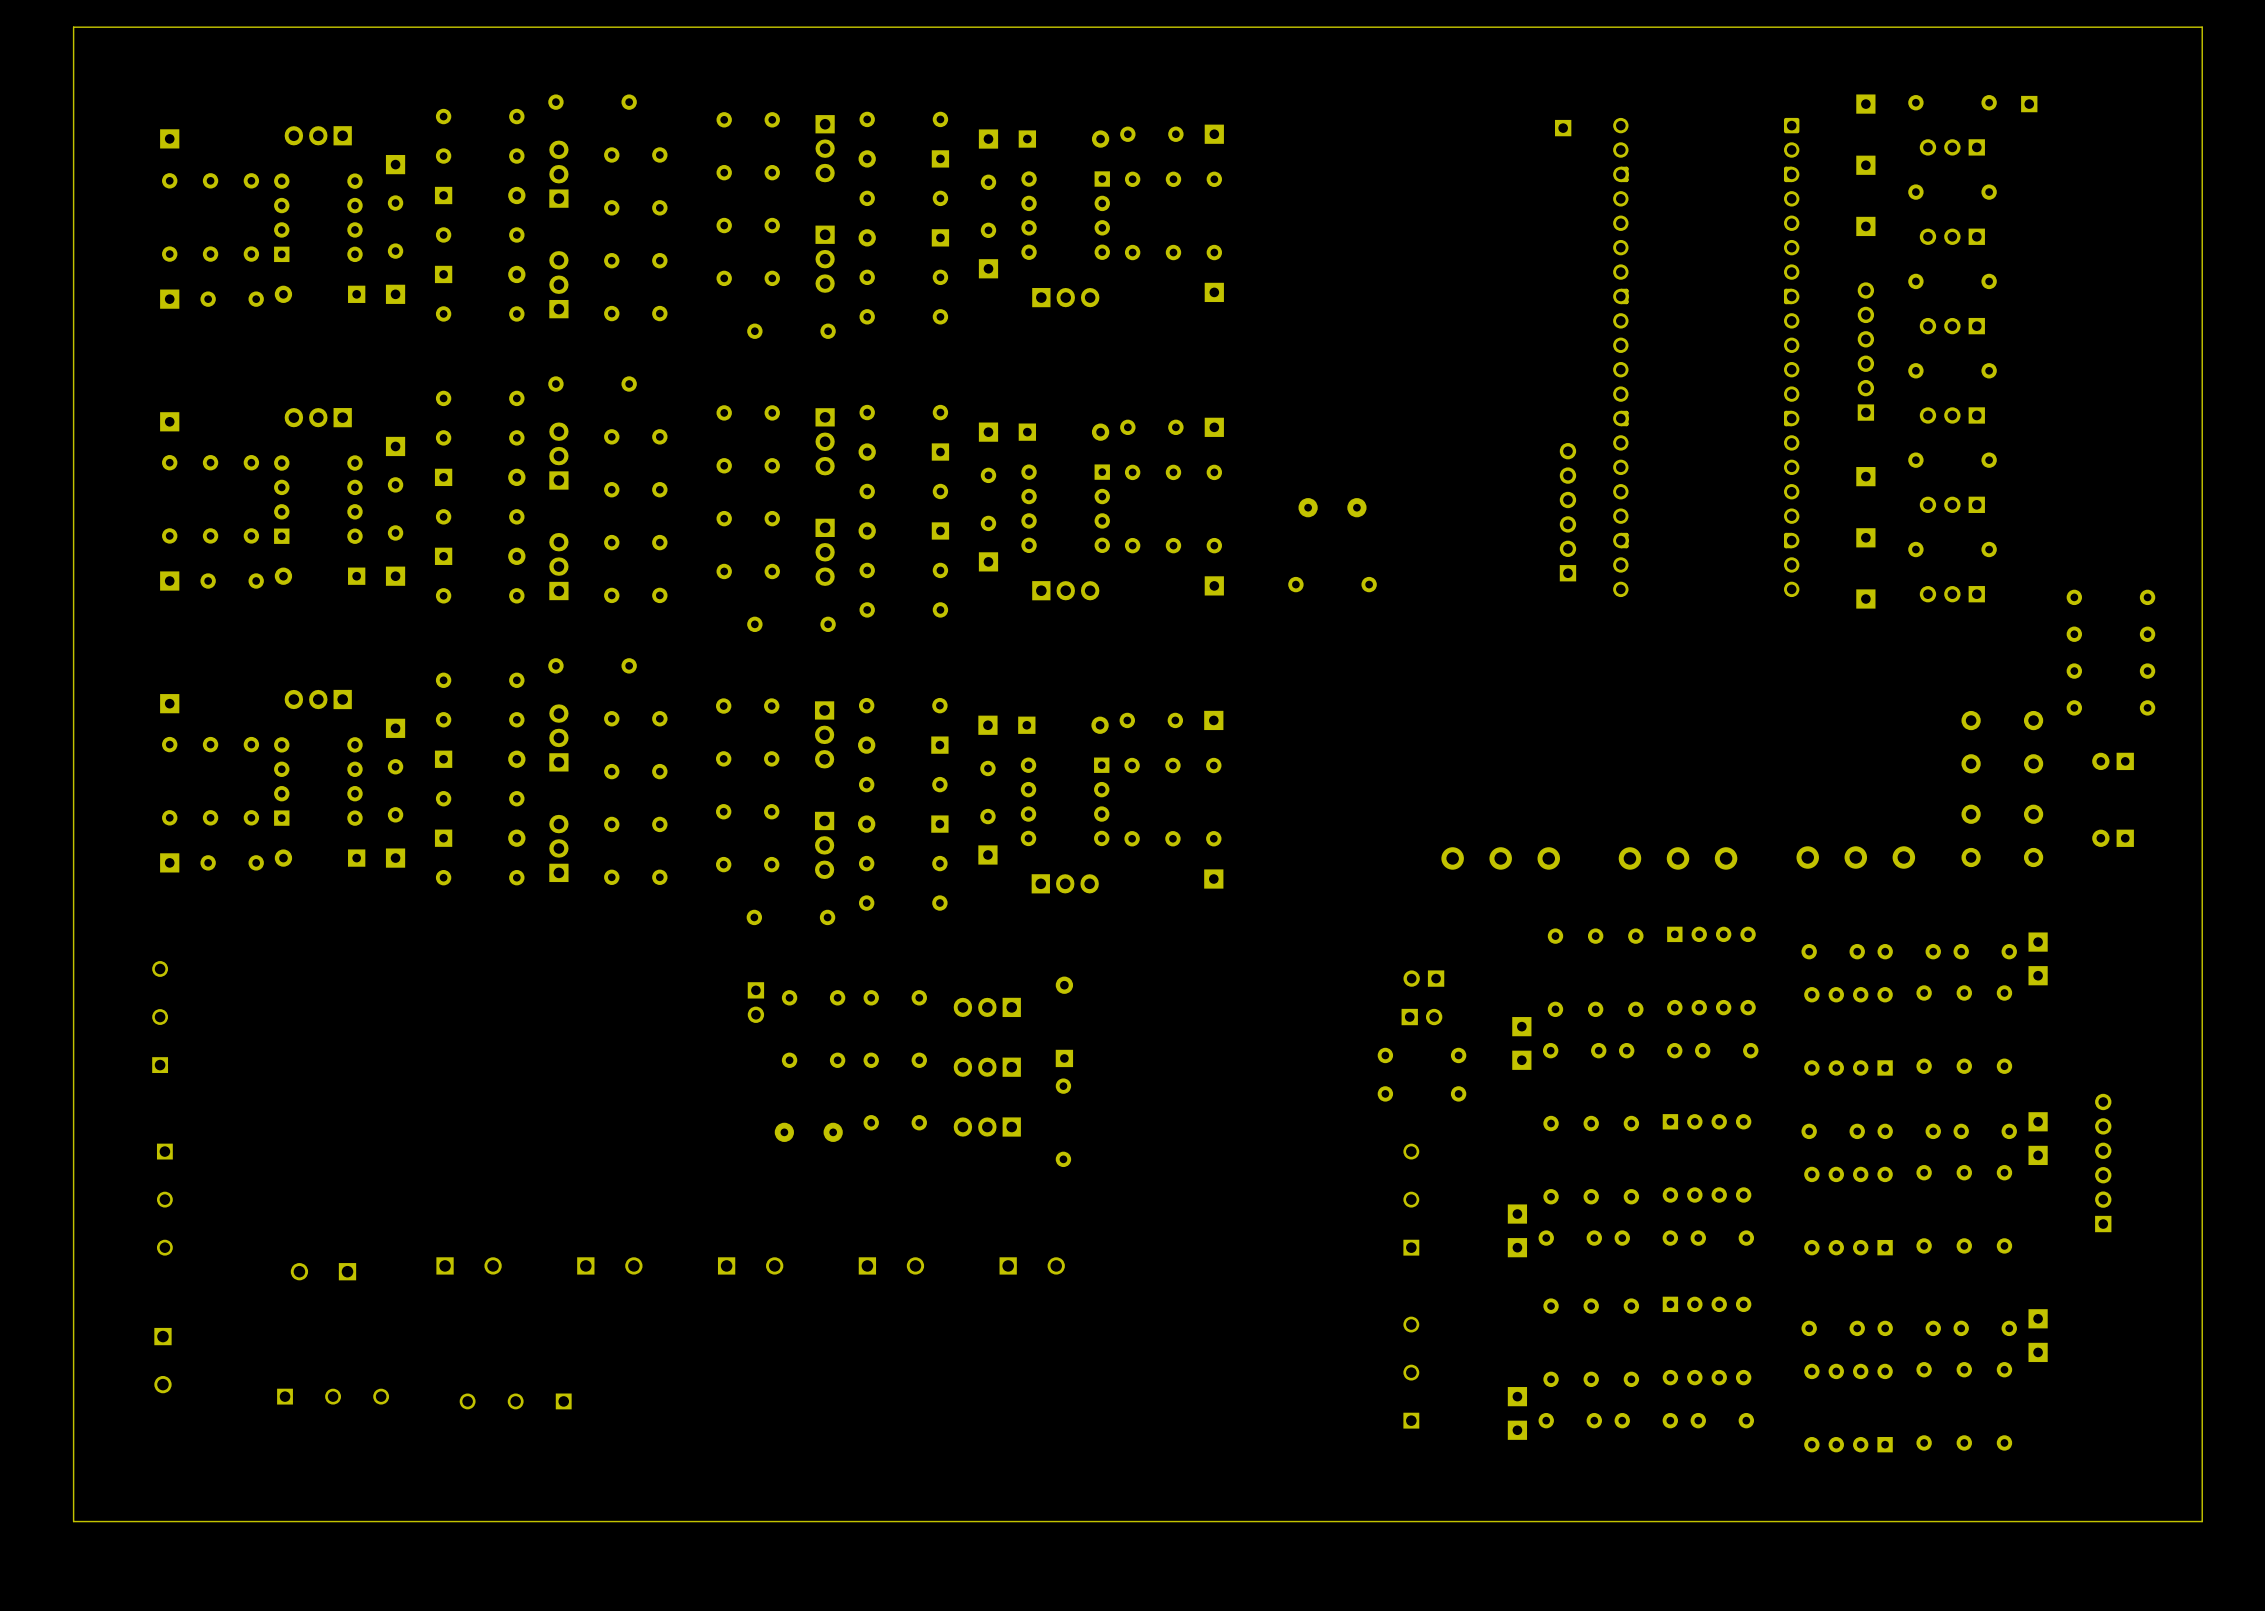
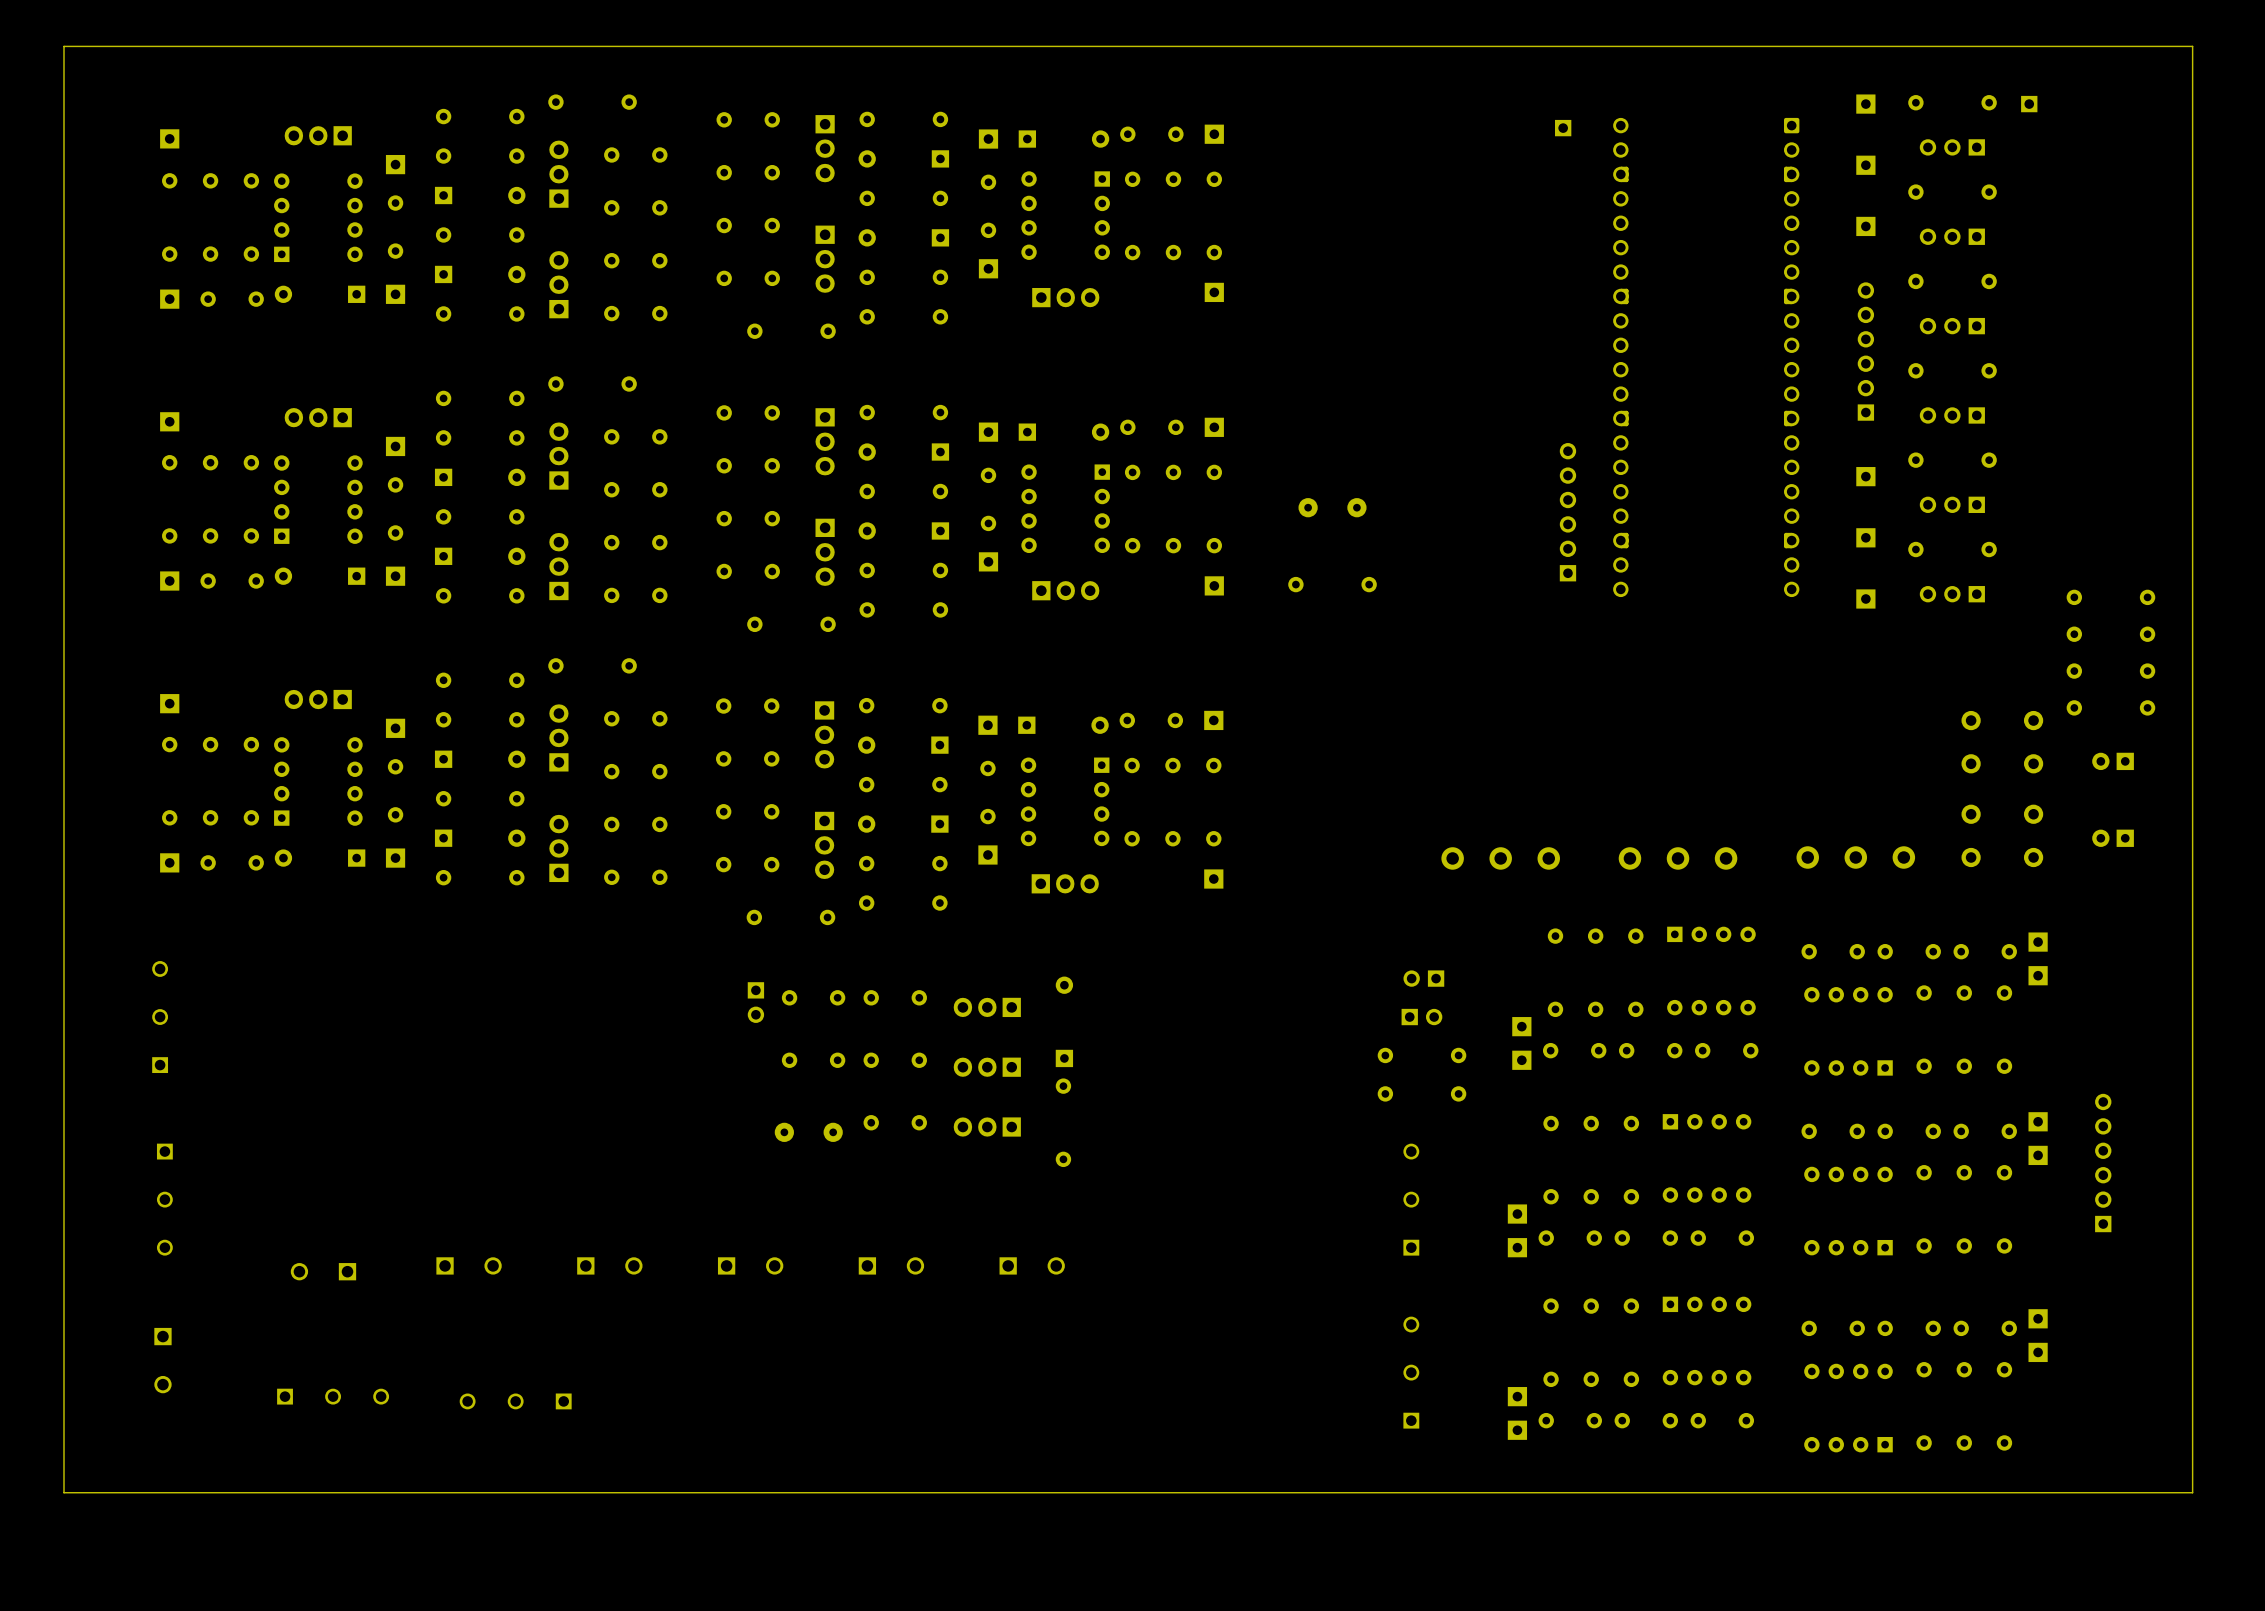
board edge: (2202, 27) (73, 27) (73, 1521) (2202, 1521) (2202, 27) -> (2192, 46) (2192, 1492) (63, 1492) (63, 46) (2192, 46)

